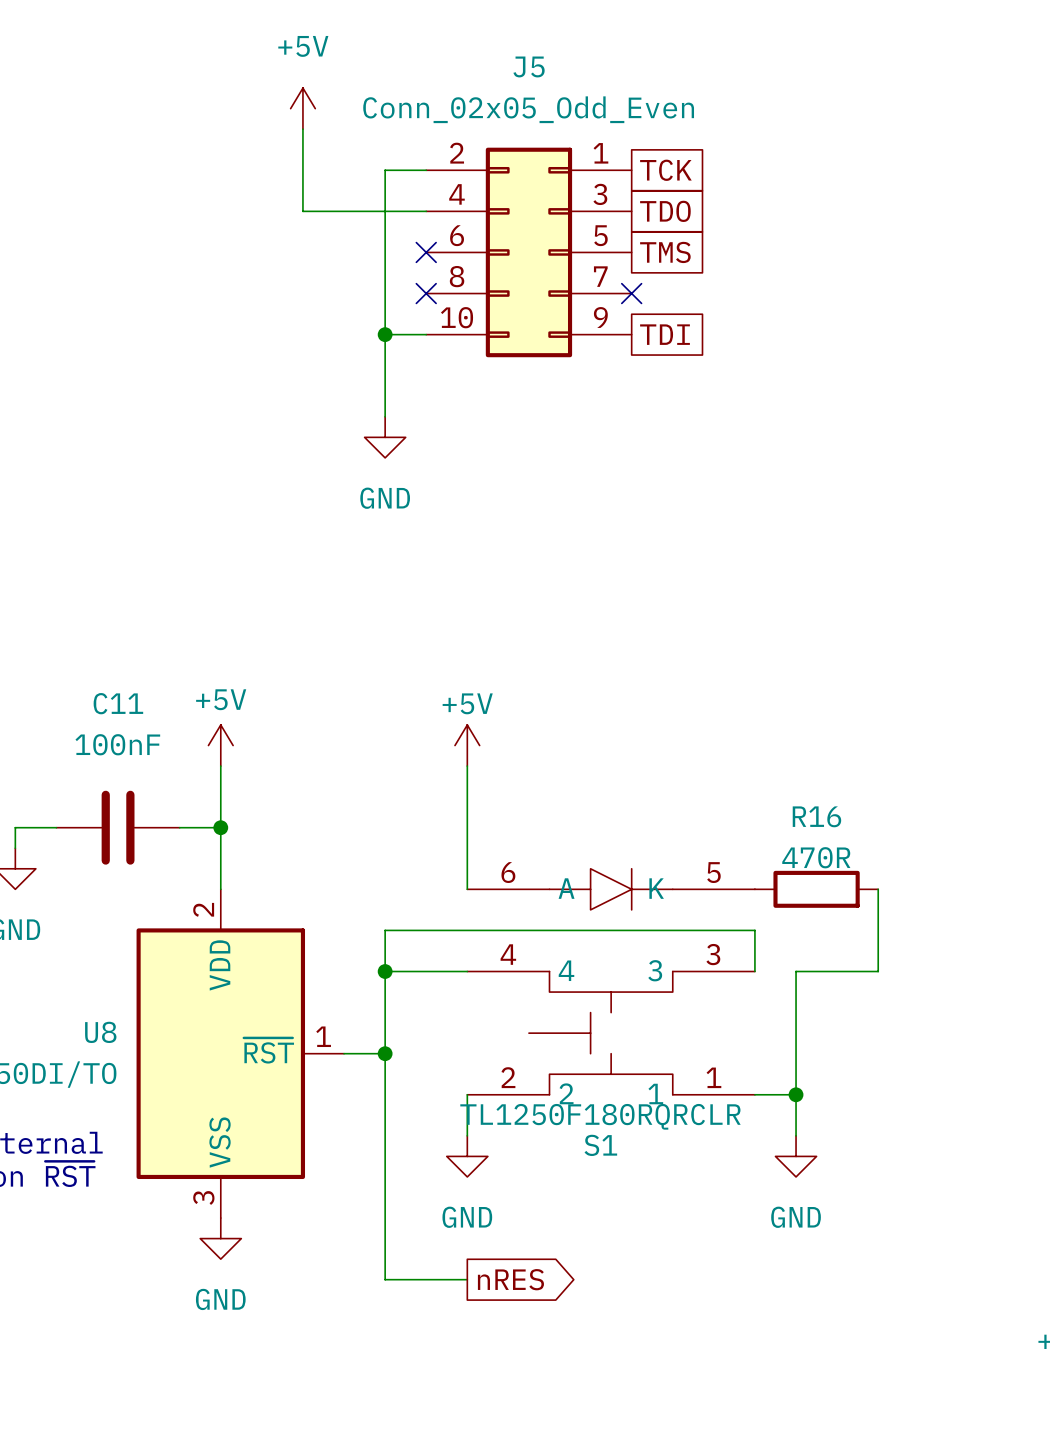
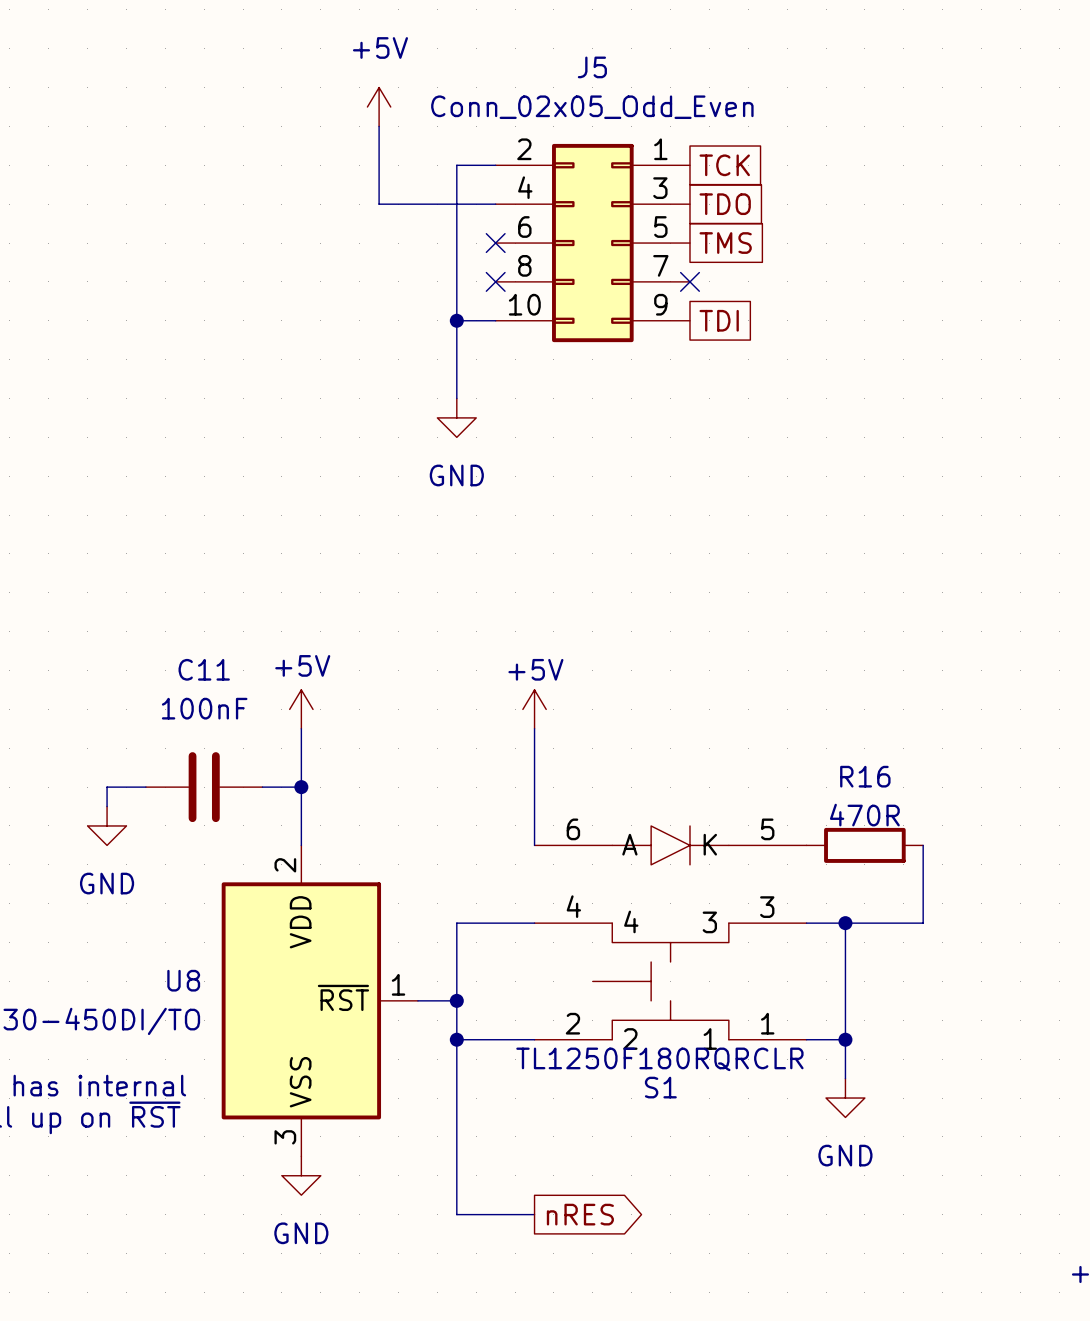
wire: (385, 971) (385, 930) (754, 930) (754, 971) -> (845, 923) (806, 923)
junction: (385, 971) -> none
junction: none -> (845, 923)
junction: none -> (456, 1039)
wire: (467, 1094) (467, 1135) -> (534, 1039) (456, 1039)
power symbol: GND (467, 1156) -> none

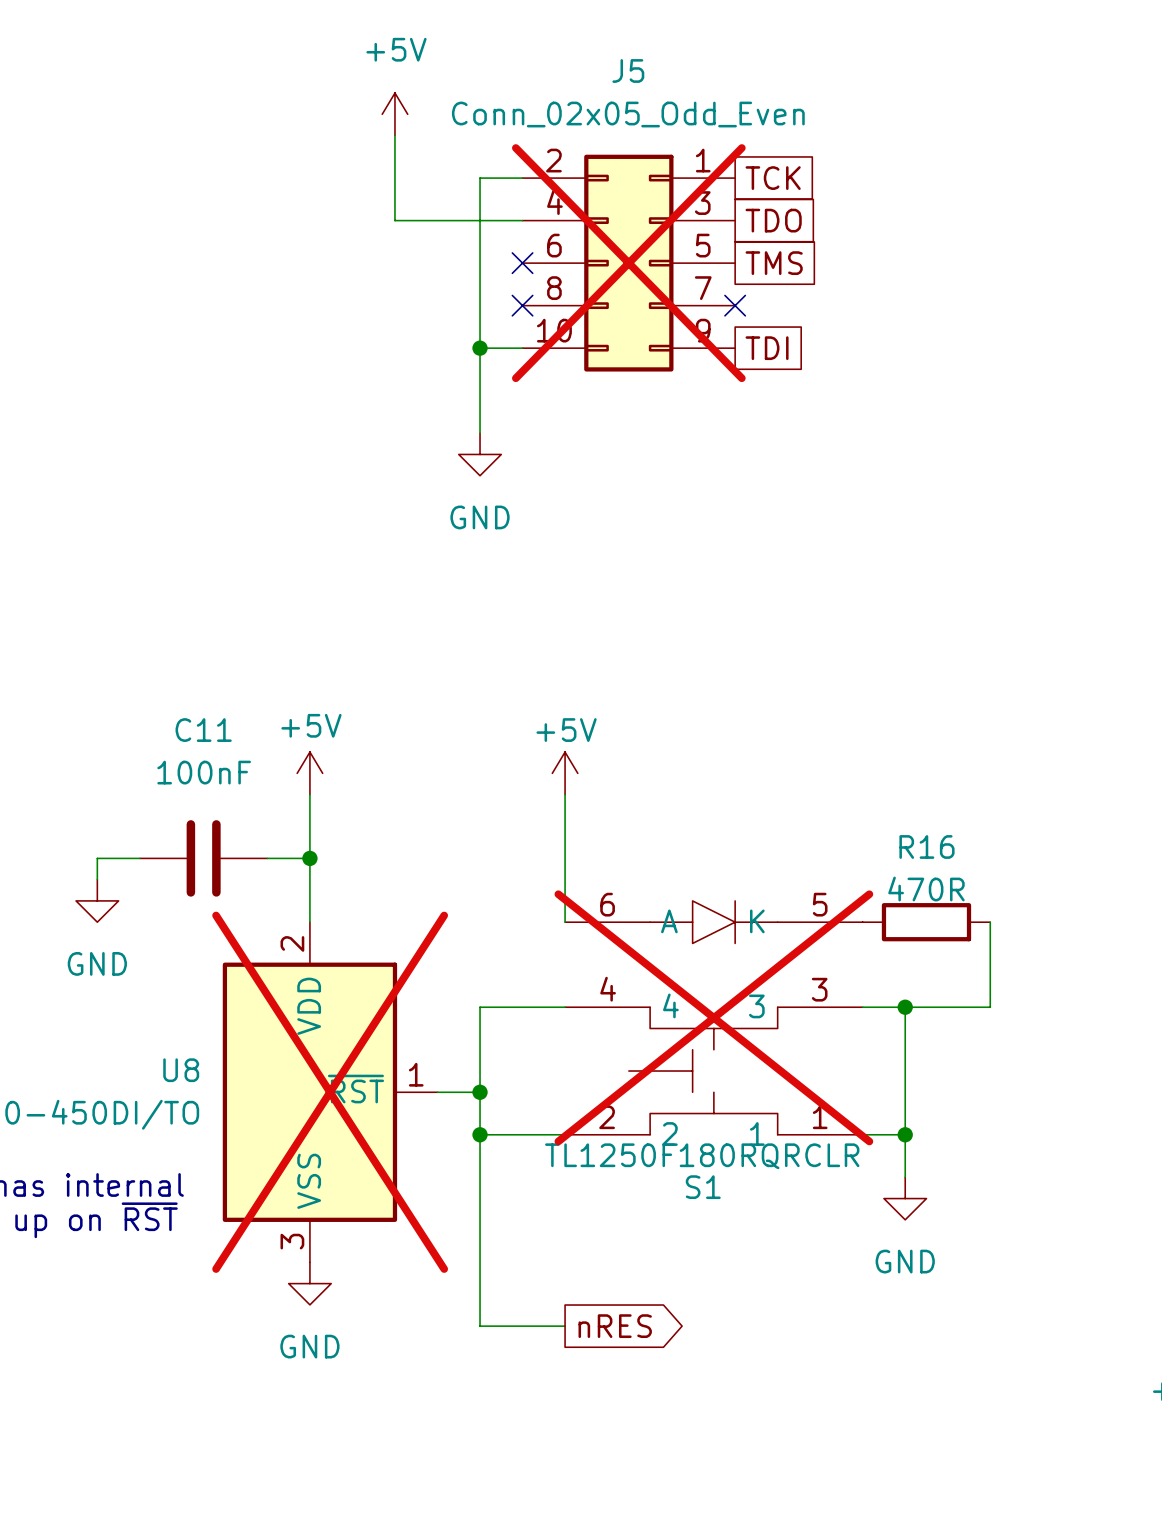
J5 do-not-place cross: none -> (628, 263)
S1 do-not-place cross: none -> (713, 1017)
U8 do-not-place cross: none -> (330, 1092)

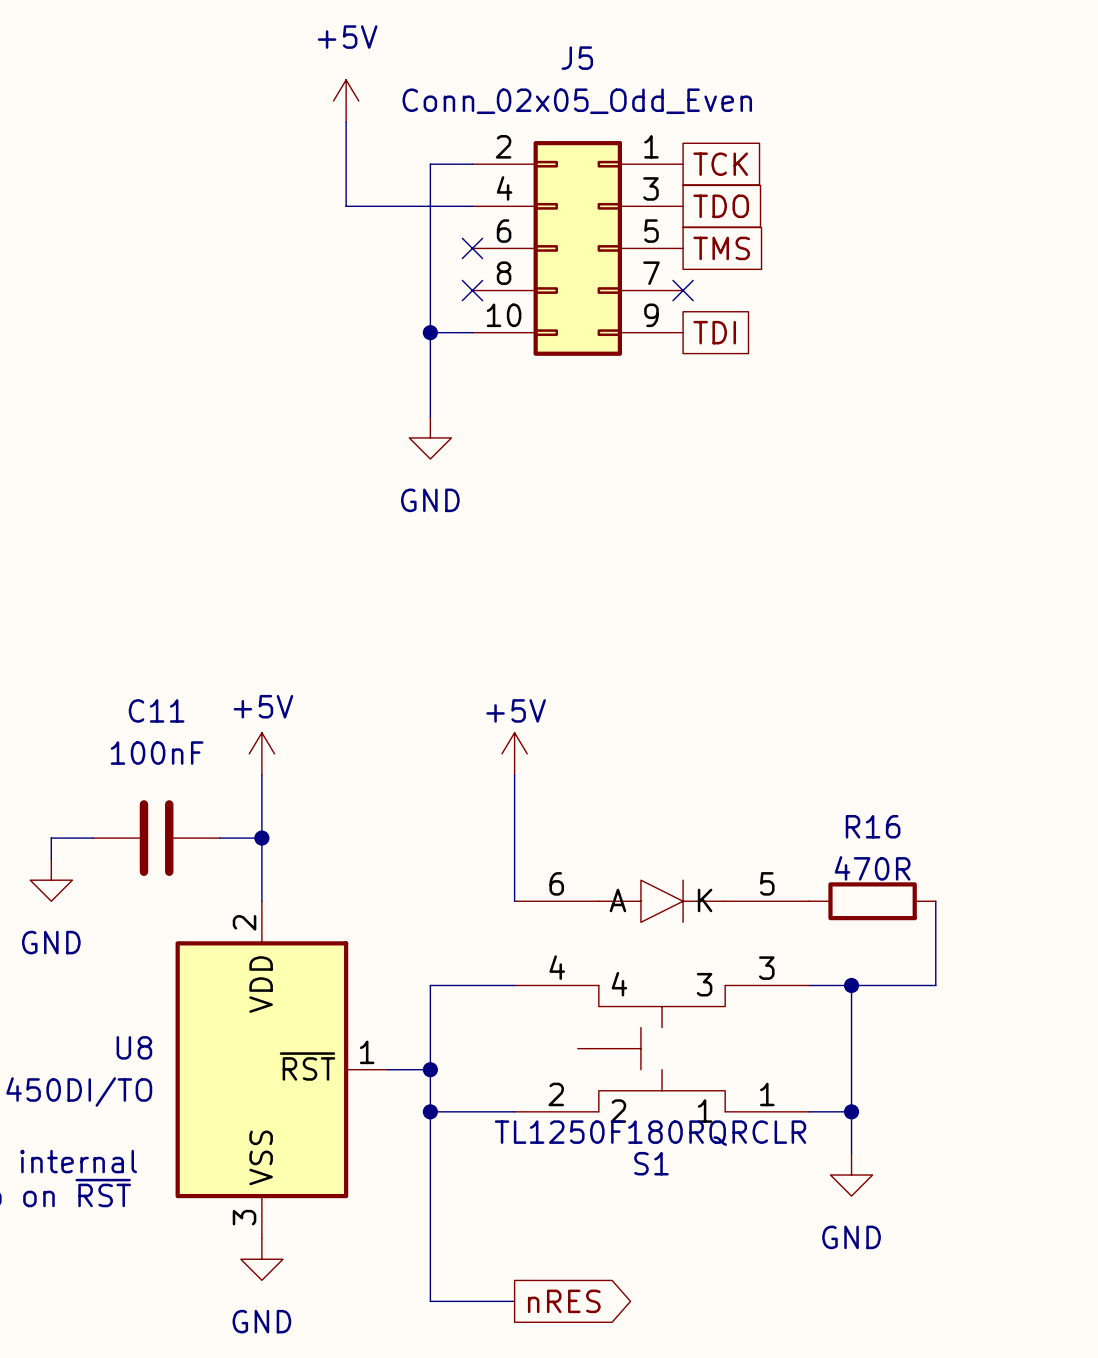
J5 do-not-place cross: (628, 263) -> none
S1 do-not-place cross: (713, 1017) -> none
U8 do-not-place cross: (330, 1092) -> none

